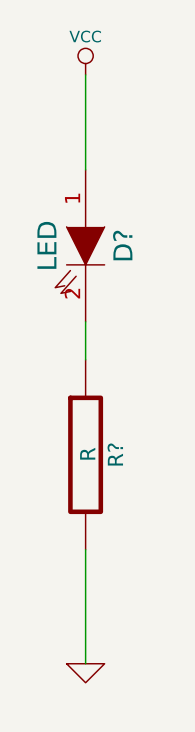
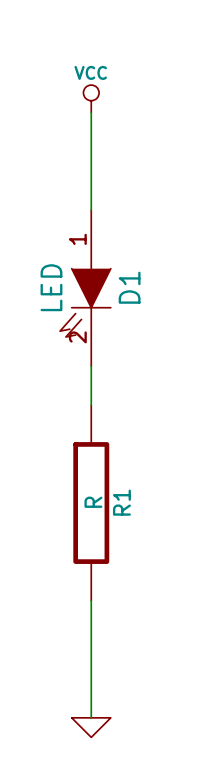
D? name: D? (122, 245) -> D1 (129, 287)
R? name: R? (115, 454) -> R1 (121, 502)

